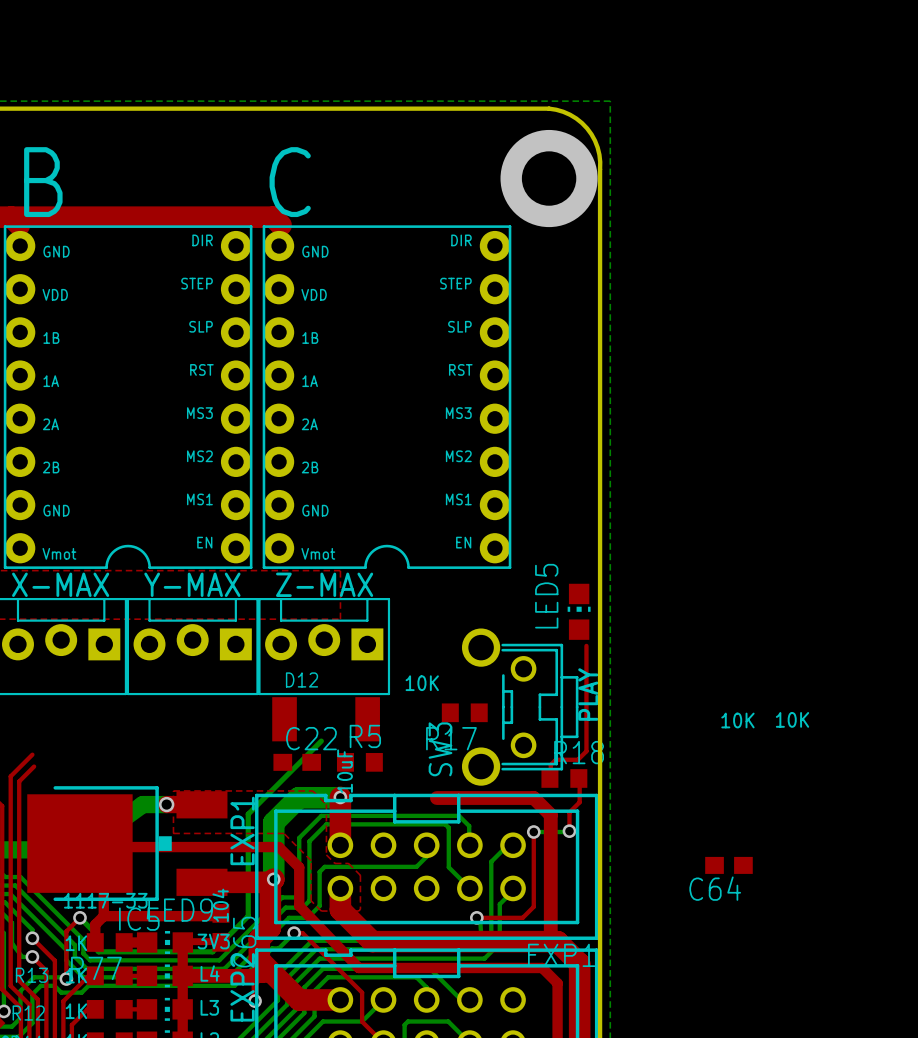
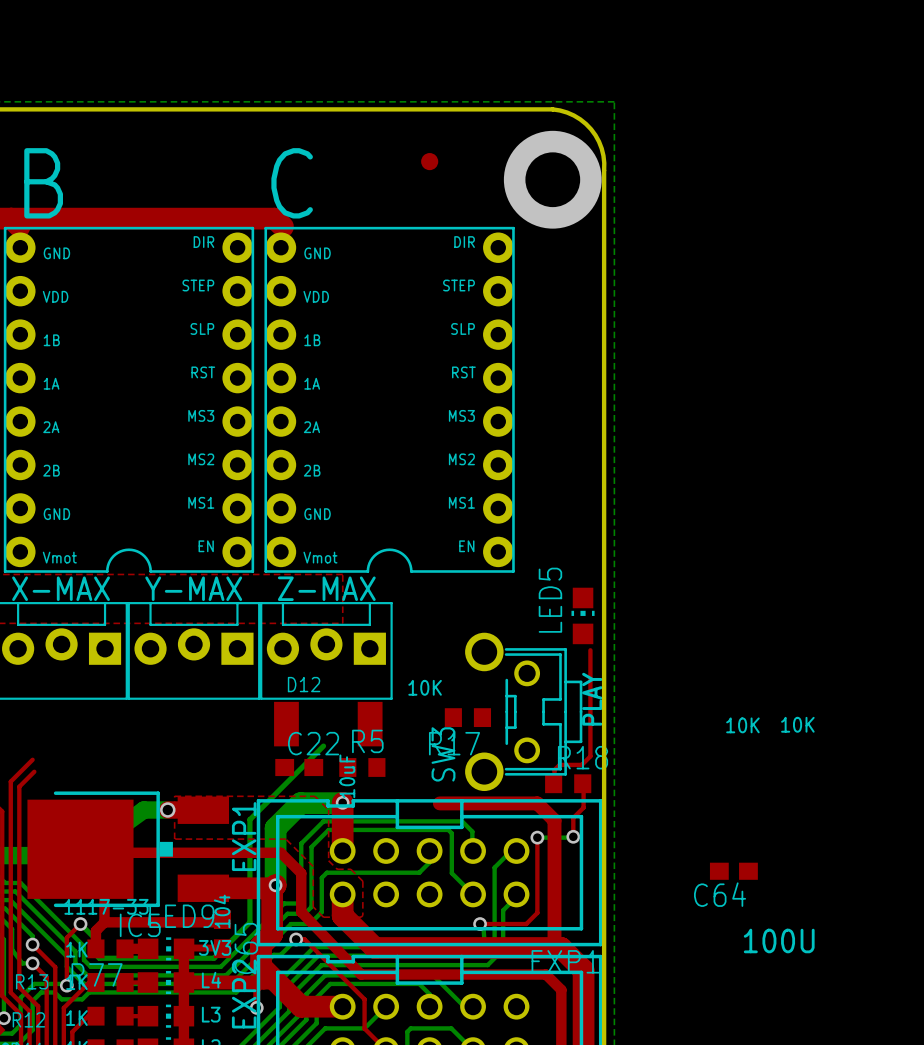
part: none -> (429, 161)
text: none -> 100U (779, 940)

